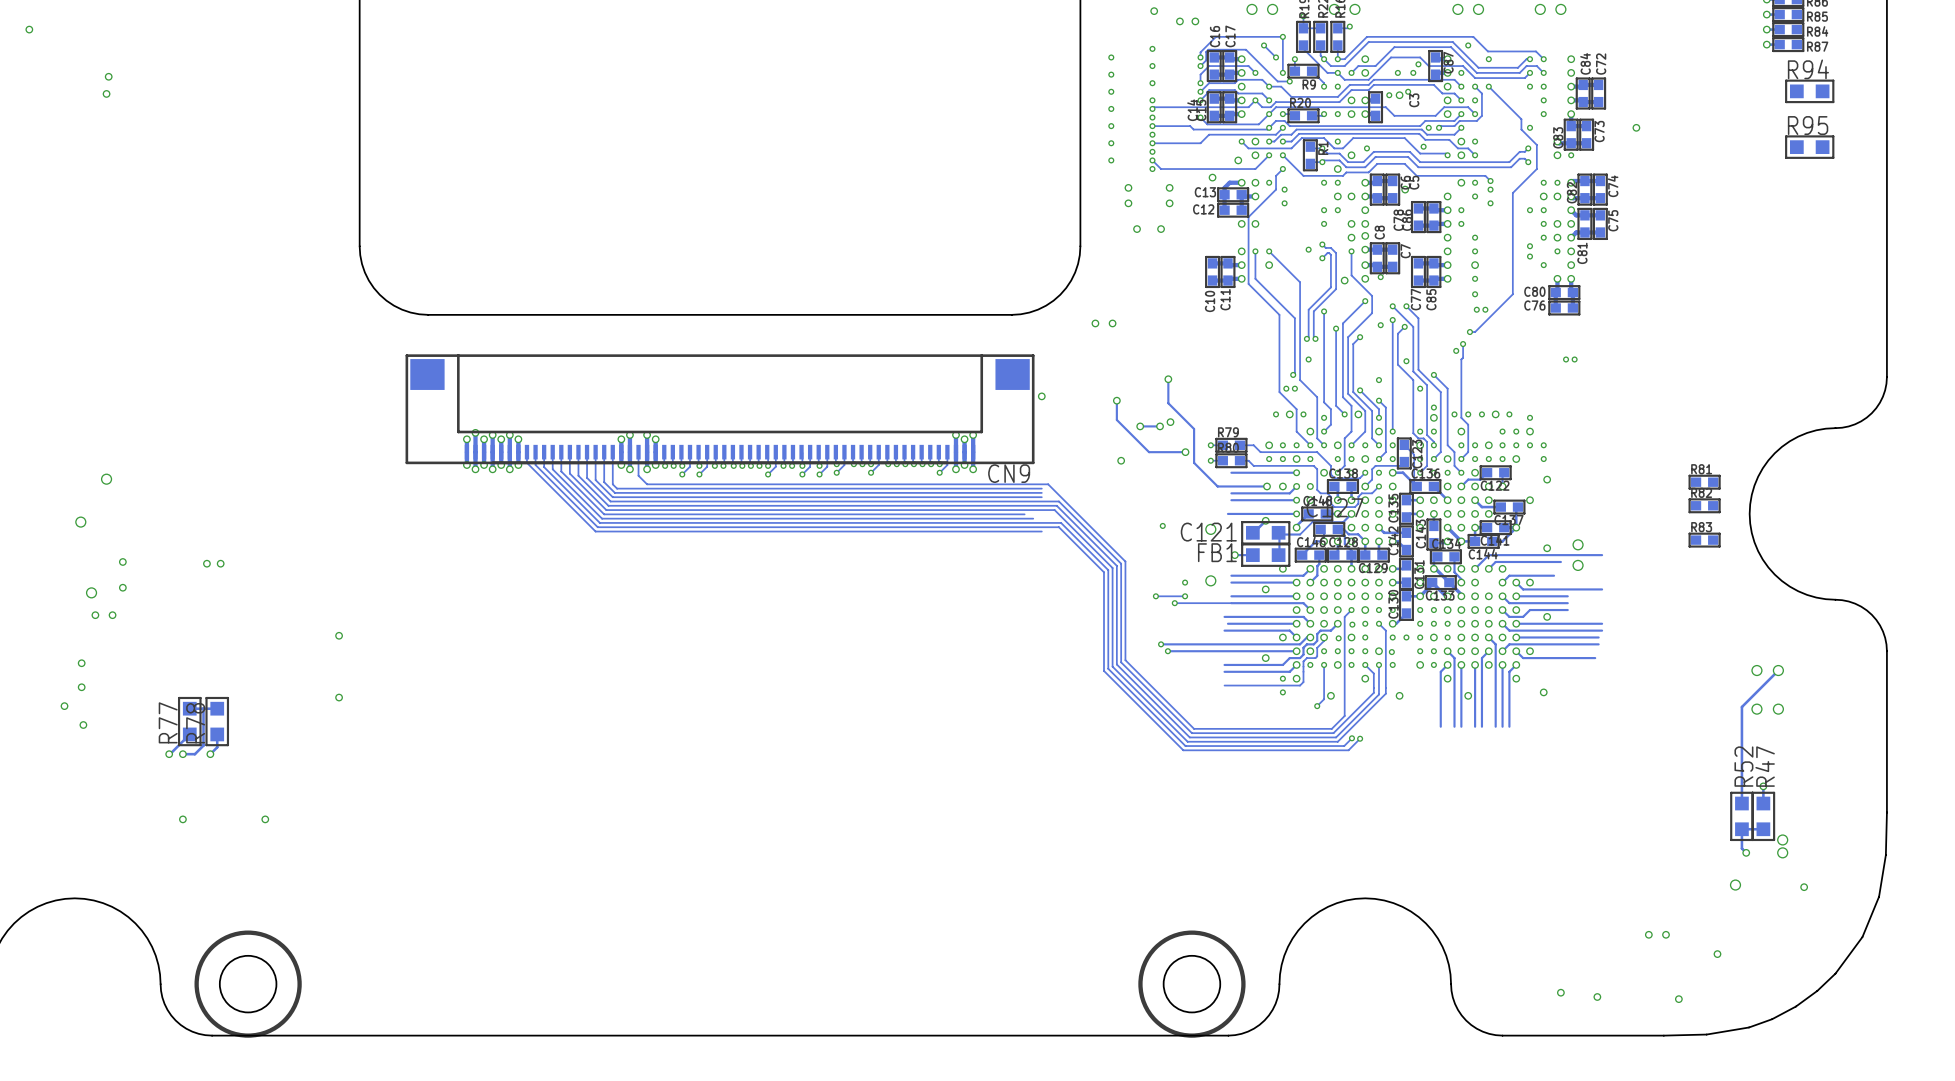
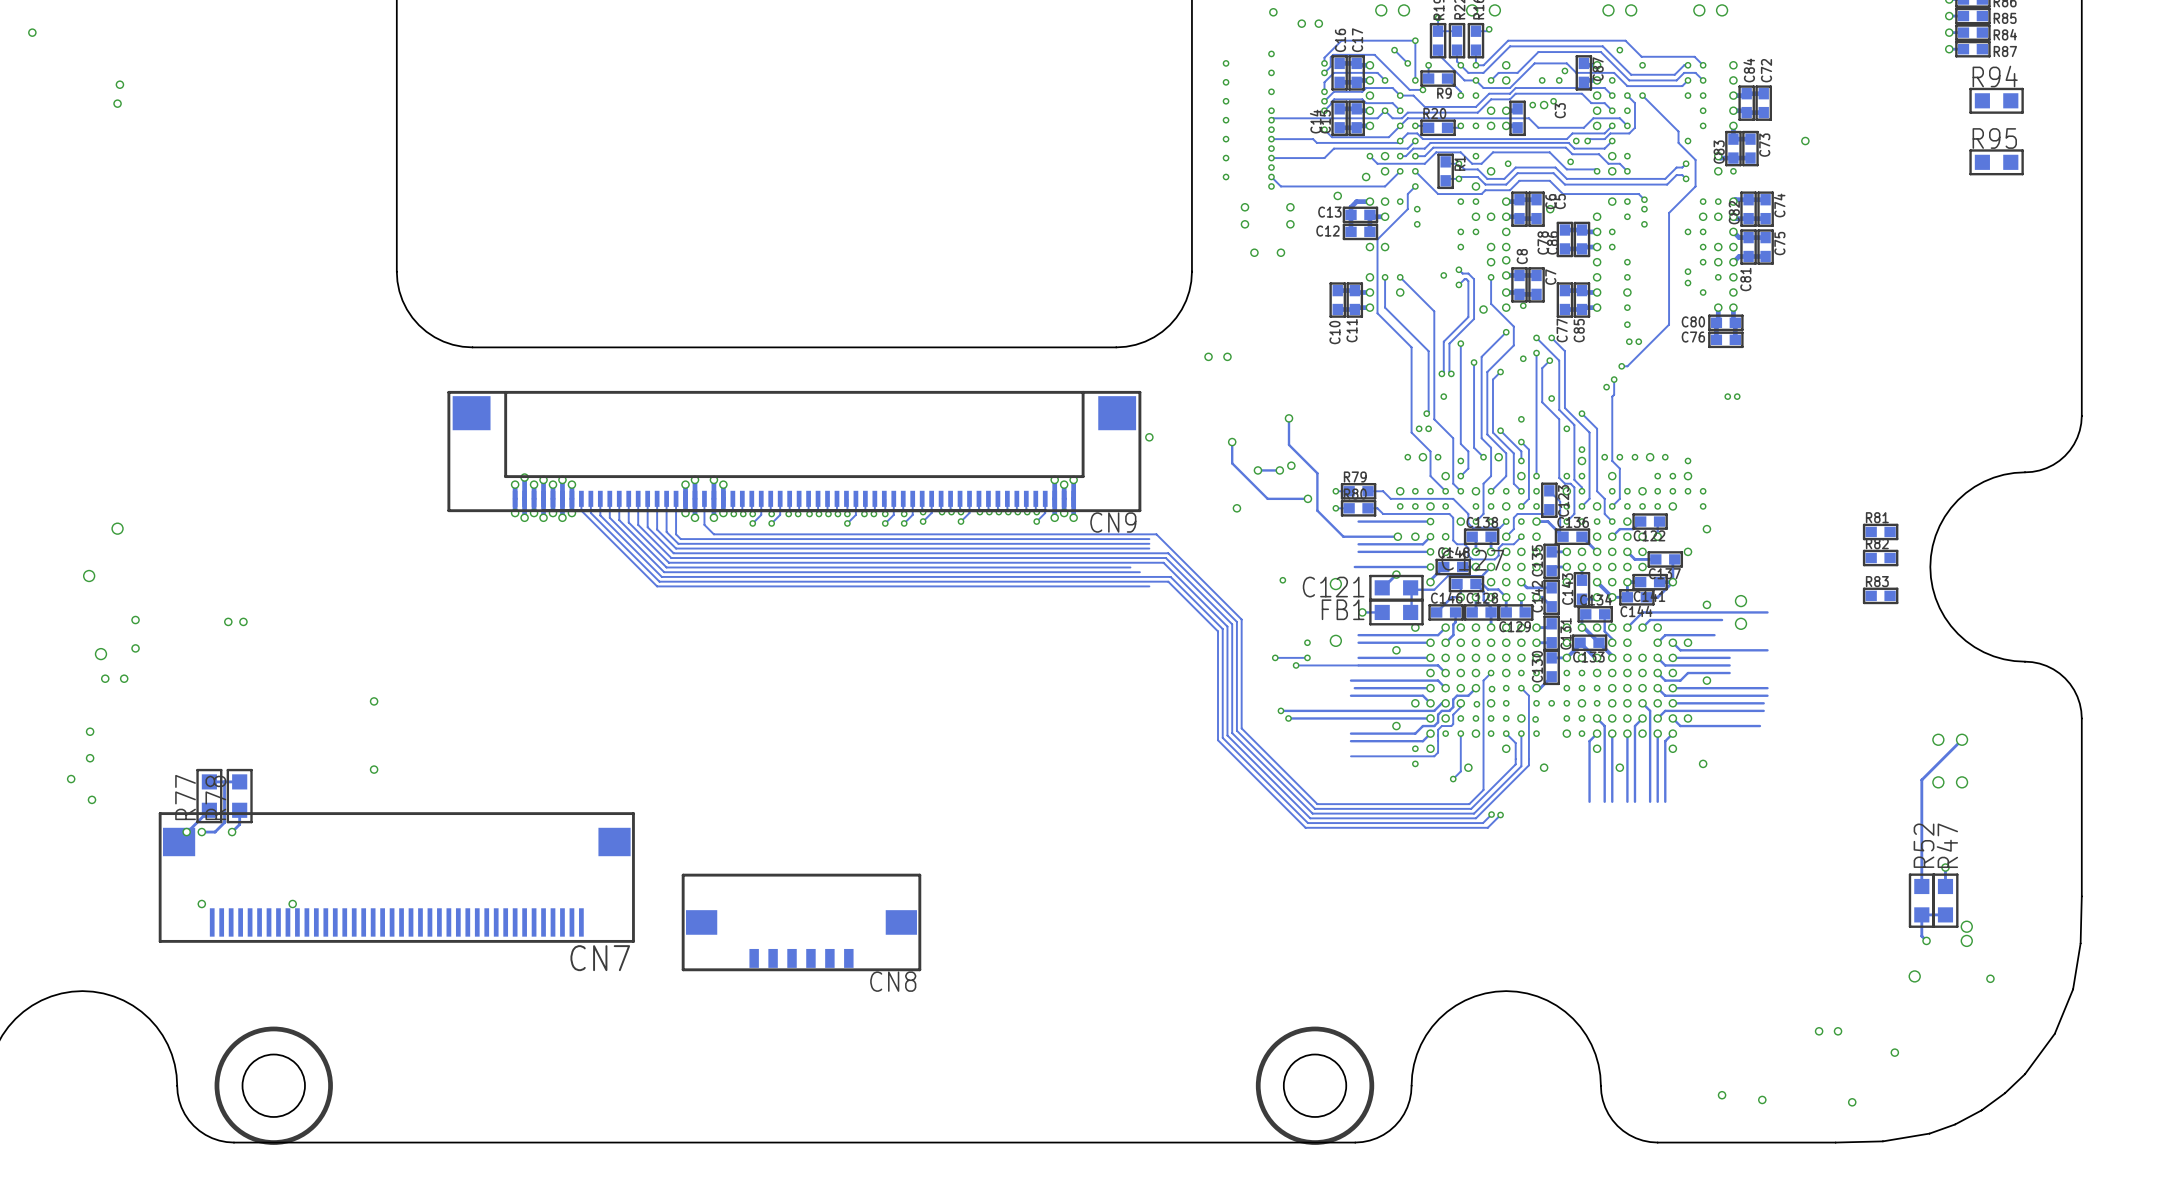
CN7: none -> (396, 877)
CN8: none -> (801, 922)

